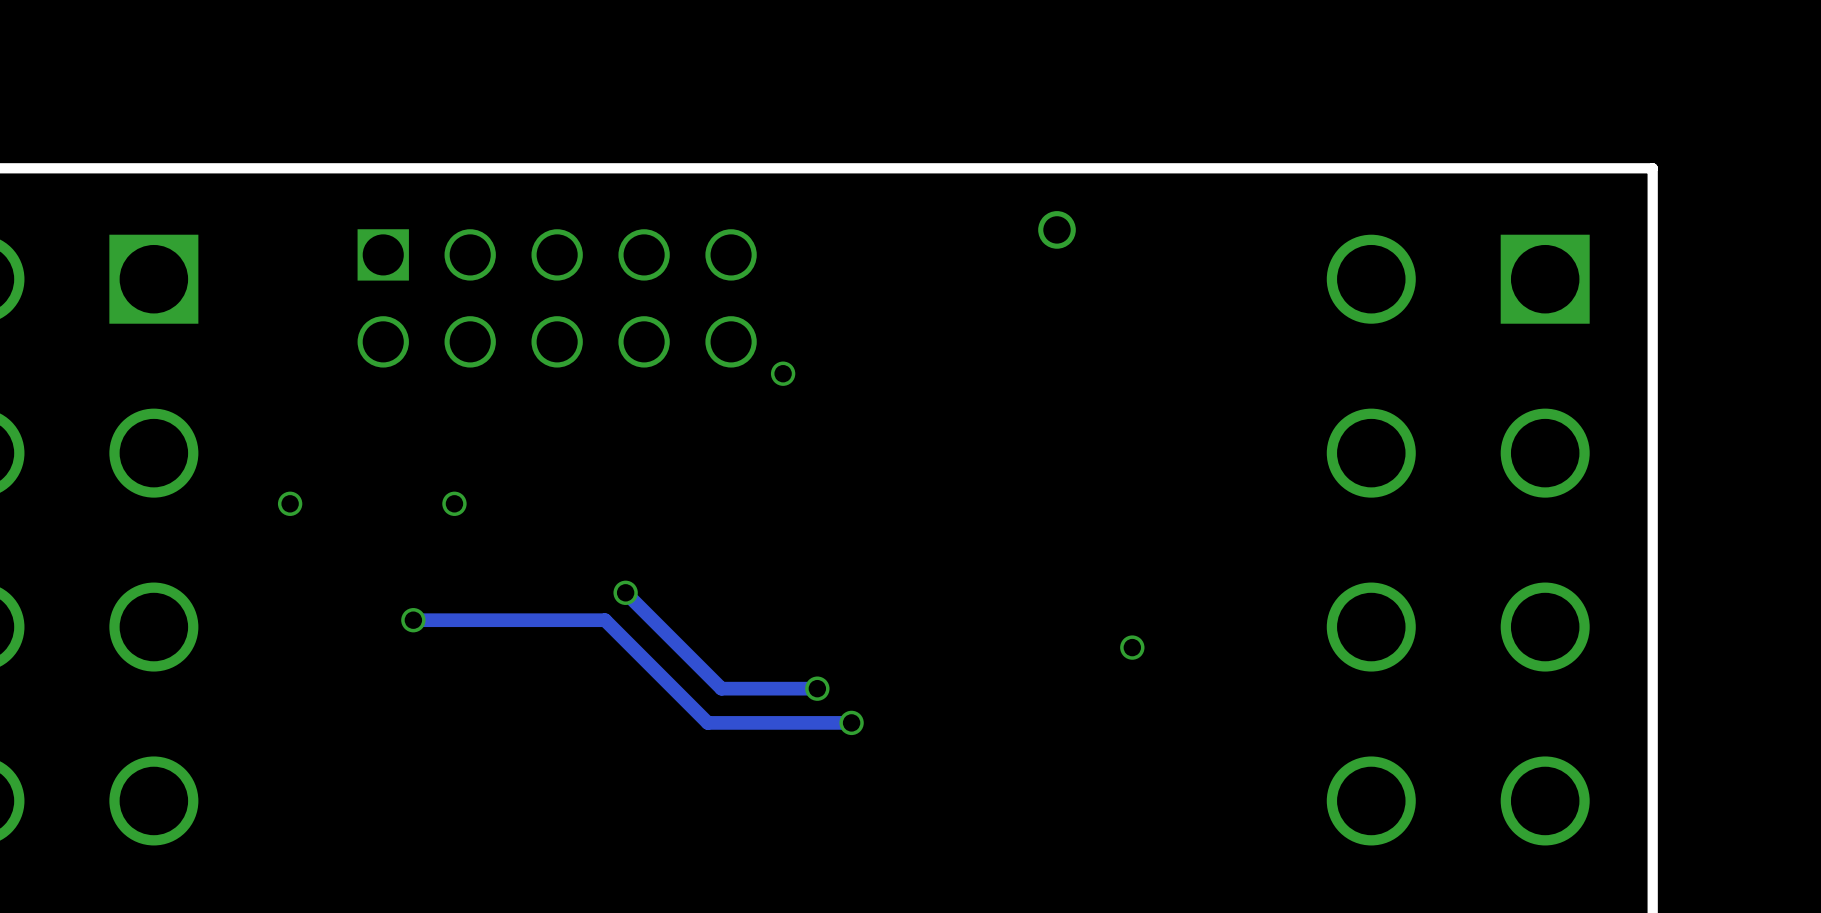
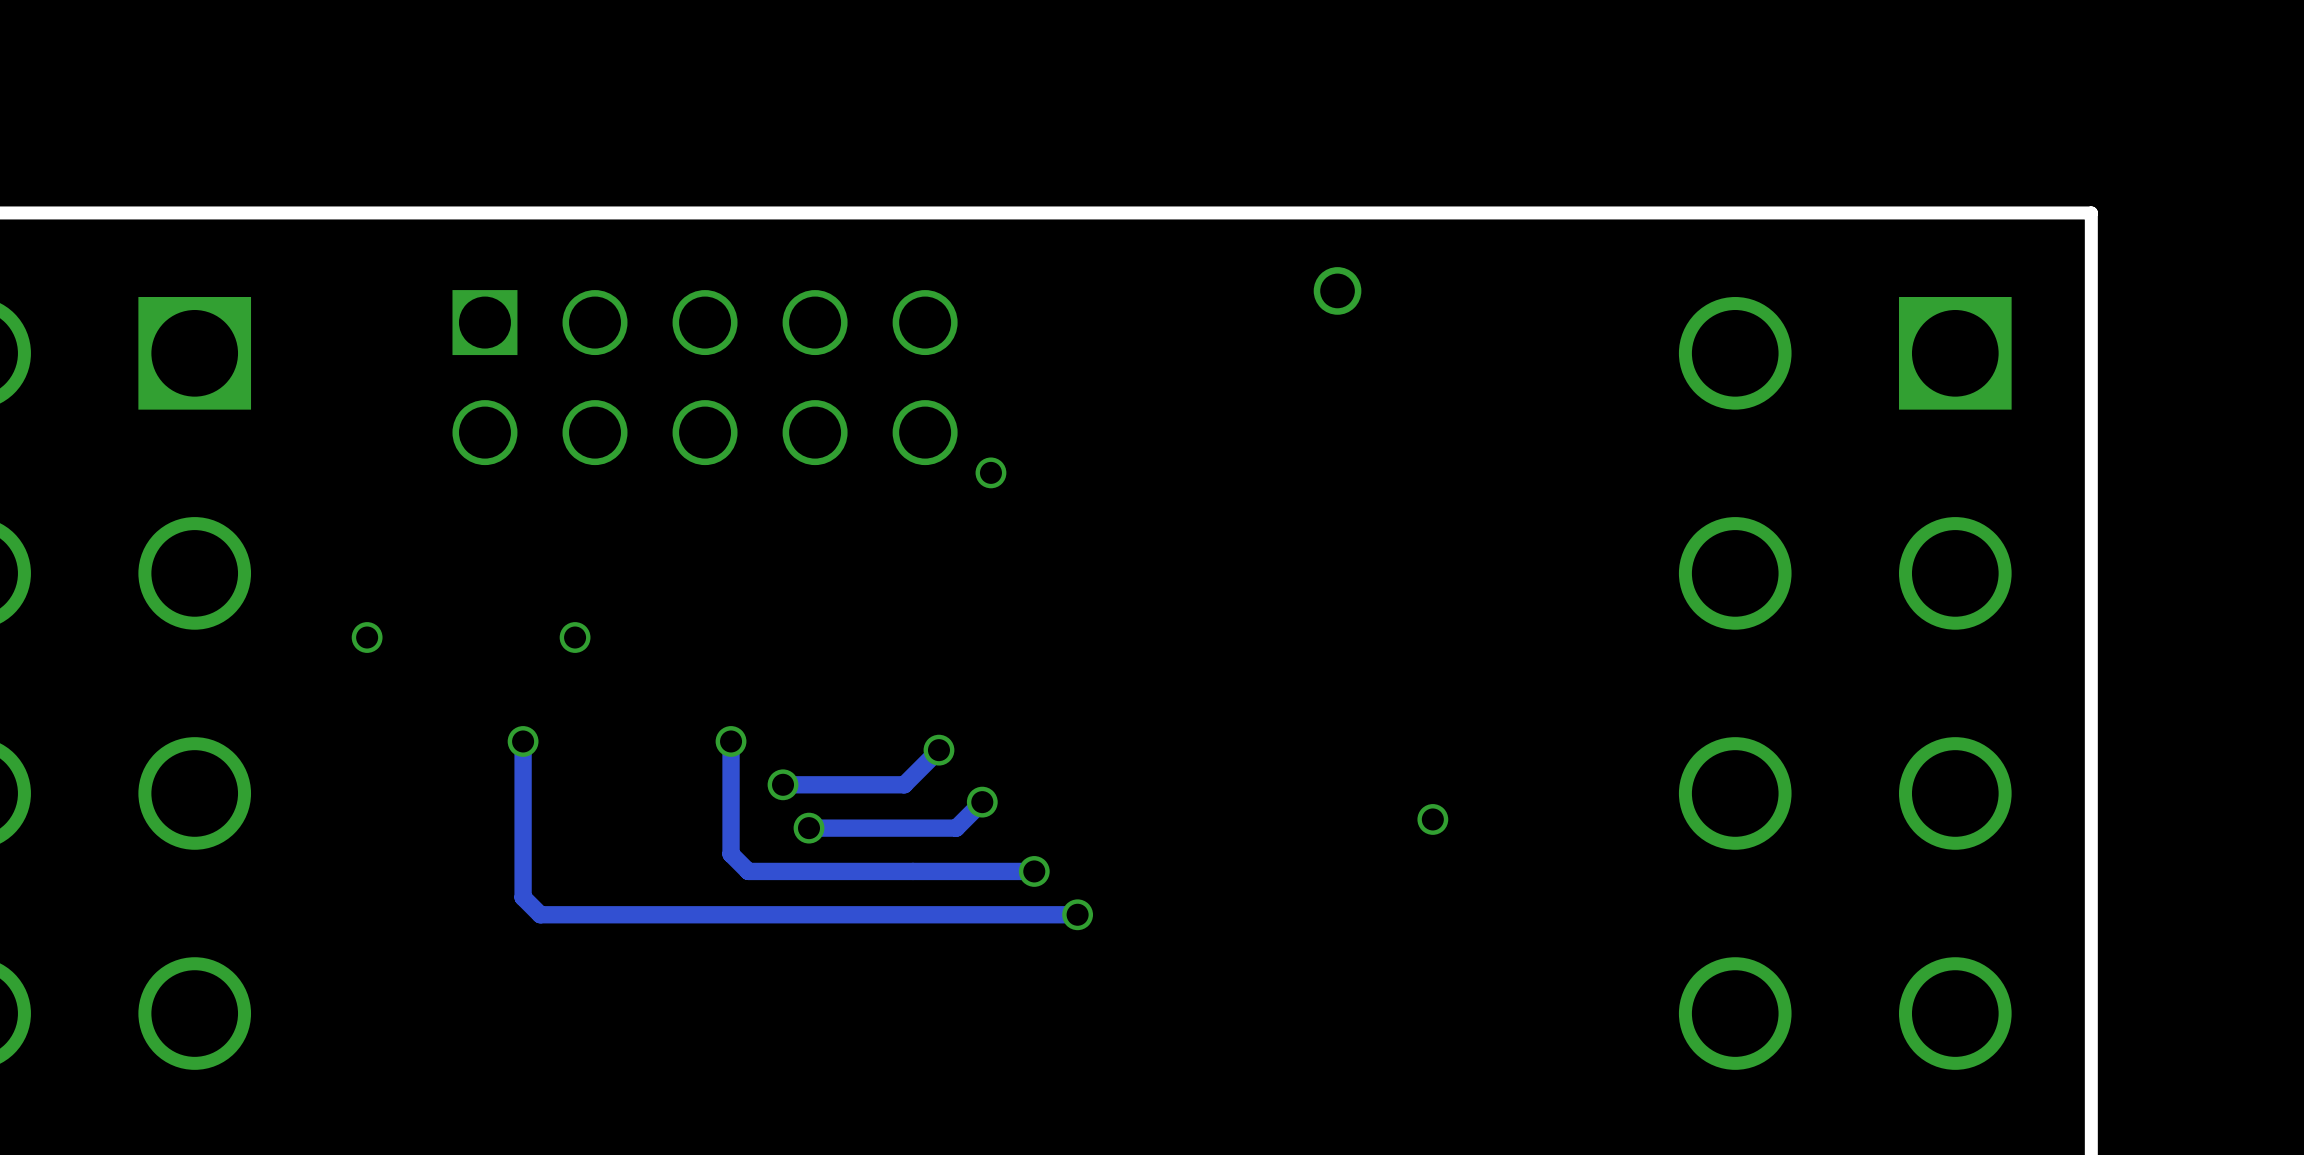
via: none -> (731, 741)
track: (625, 592) (721, 688) -> (731, 741) (731, 854) (748, 871) (912, 871)
via: (625, 592) -> none
track: none -> (938, 750) (904, 784) (783, 784)
via: none -> (938, 750)
track: (413, 620) (605, 620) (707, 722) -> (523, 741) (523, 897) (540, 914) (895, 914)
via position: (413, 620) -> (523, 741)
via: none -> (783, 784)
track: none -> (982, 802) (956, 828) (809, 828)
via: none -> (982, 802)
via: none -> (809, 828)

